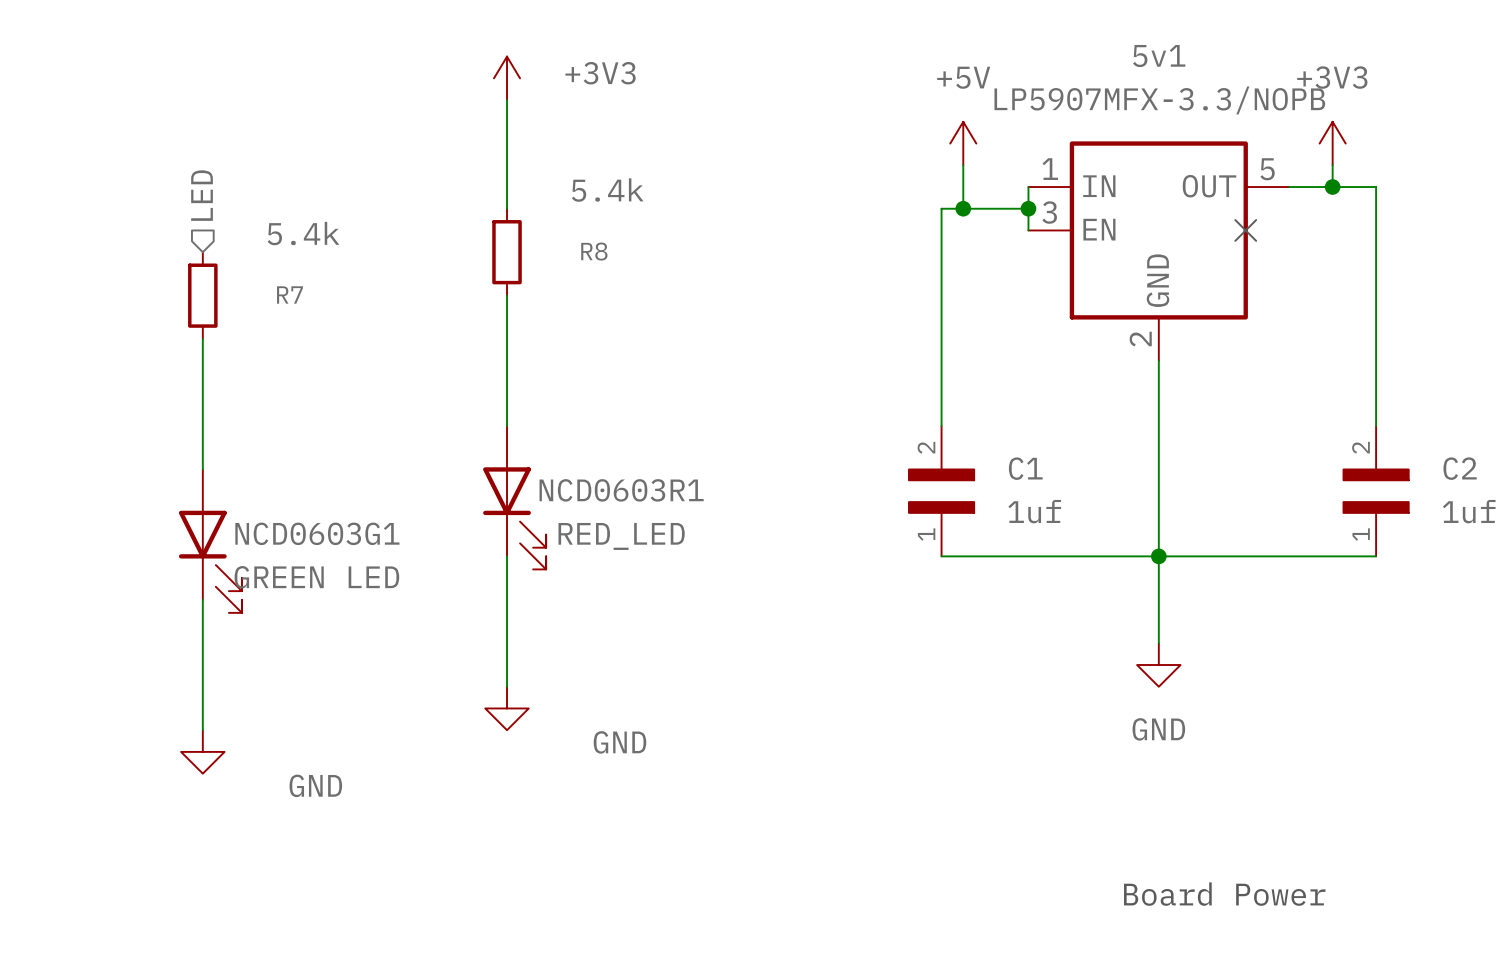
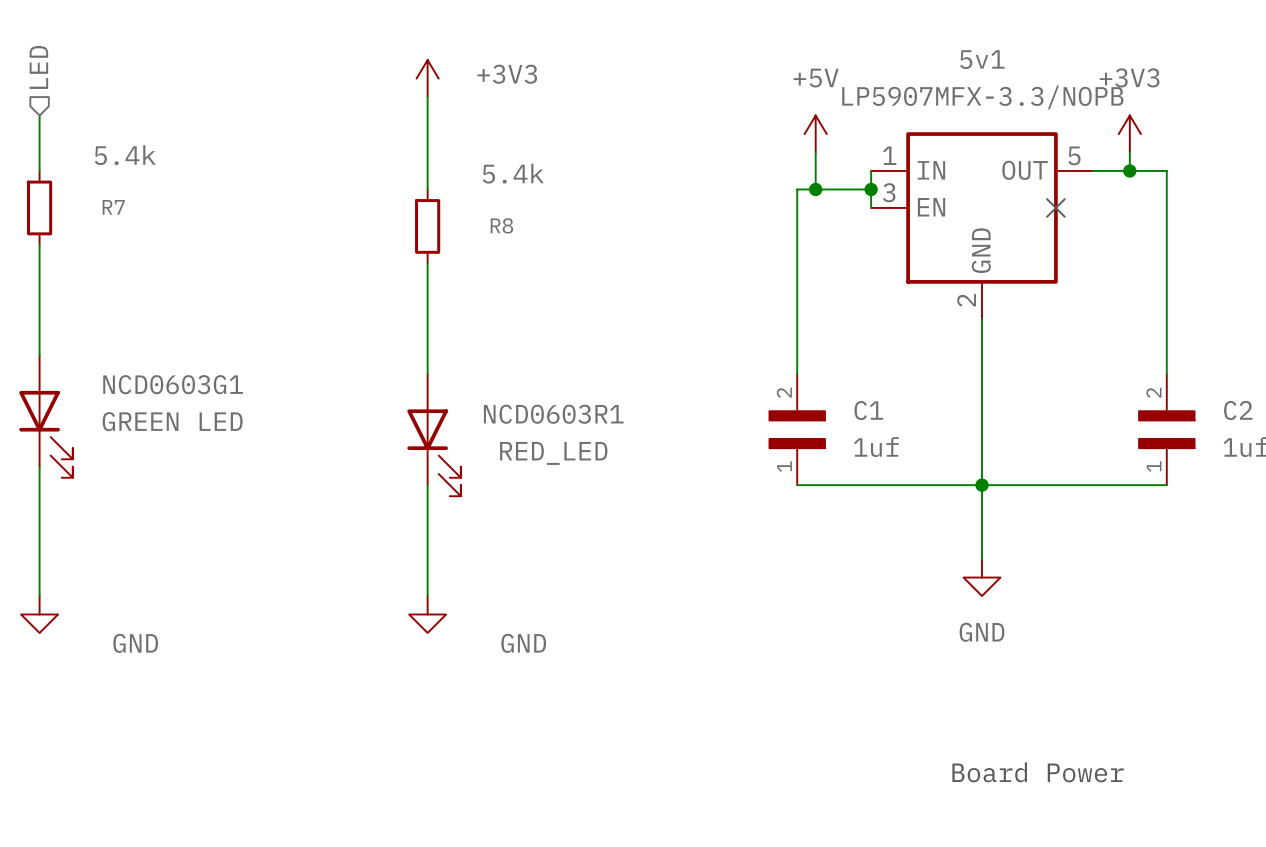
wire: none -> (39, 115) (39, 171)
hierarchical label position: LED (202, 195) -> LED (38, 67)
R7 position: (202, 295) -> (39, 207)
wire: (202, 339) (202, 469) -> (39, 244) (39, 355)
NCD0603R1 name position: NCD0603R1 (621, 490) -> NCD0603R1 (553, 414)
NCD0603G1 name position: NCD0603G1 (317, 533) -> NCD0603G1 (173, 384)
wire: none -> (39, 466) (39, 596)
NCD0603R1 value position: RED_LED (621, 536) -> RED_LED (553, 453)
NCD0603G1 position: (210, 541) -> (46, 416)
NCD0603G1 value position: GREEN LED (316, 577) -> GREEN LED (172, 421)
wire: (202, 599) (202, 730) -> none
power symbol position: GND (202, 751) -> GND (39, 614)

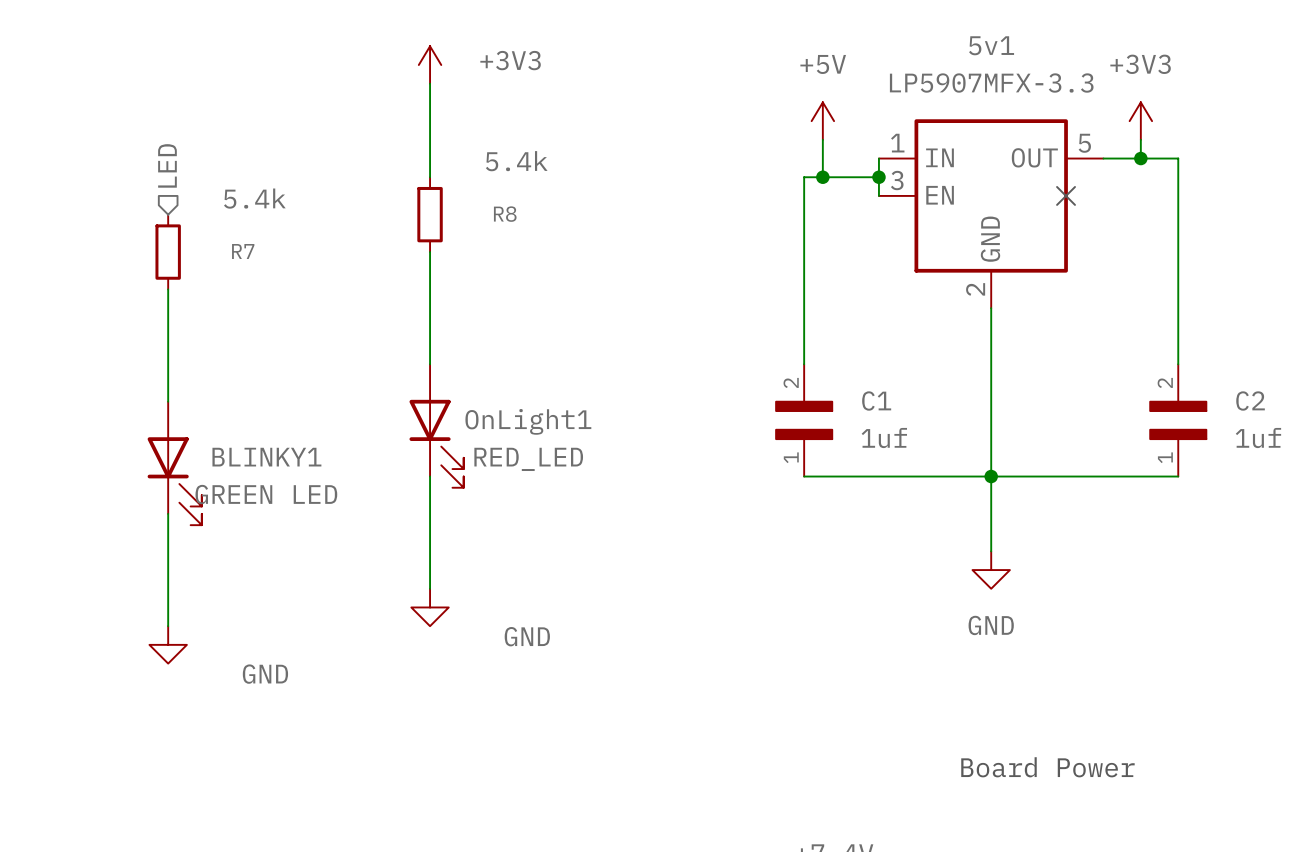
hierarchical label position: LED (38, 67) -> LED (167, 165)
5v1 value: LP5907MFX-3.3/NOPB (982, 97) -> LP5907MFX-3.3 (991, 83)
wire: (39, 115) (39, 171) -> none
R7 position: (39, 207) -> (168, 252)
wire: (39, 244) (39, 355) -> (168, 289) (168, 401)
NCD0603R1 name: NCD0603R1 (553, 414) -> OnLight1 (528, 421)
NCD0603G1: GREEN LED (46, 416) -> none
NCD0603R1 value position: RED_LED (553, 453) -> RED_LED (528, 459)
wire: (39, 466) (39, 596) -> none
BLINKY1: none -> GREEN LED (174, 463)
wire: none -> (168, 513) (168, 626)
power symbol position: GND (39, 614) -> GND (168, 644)

